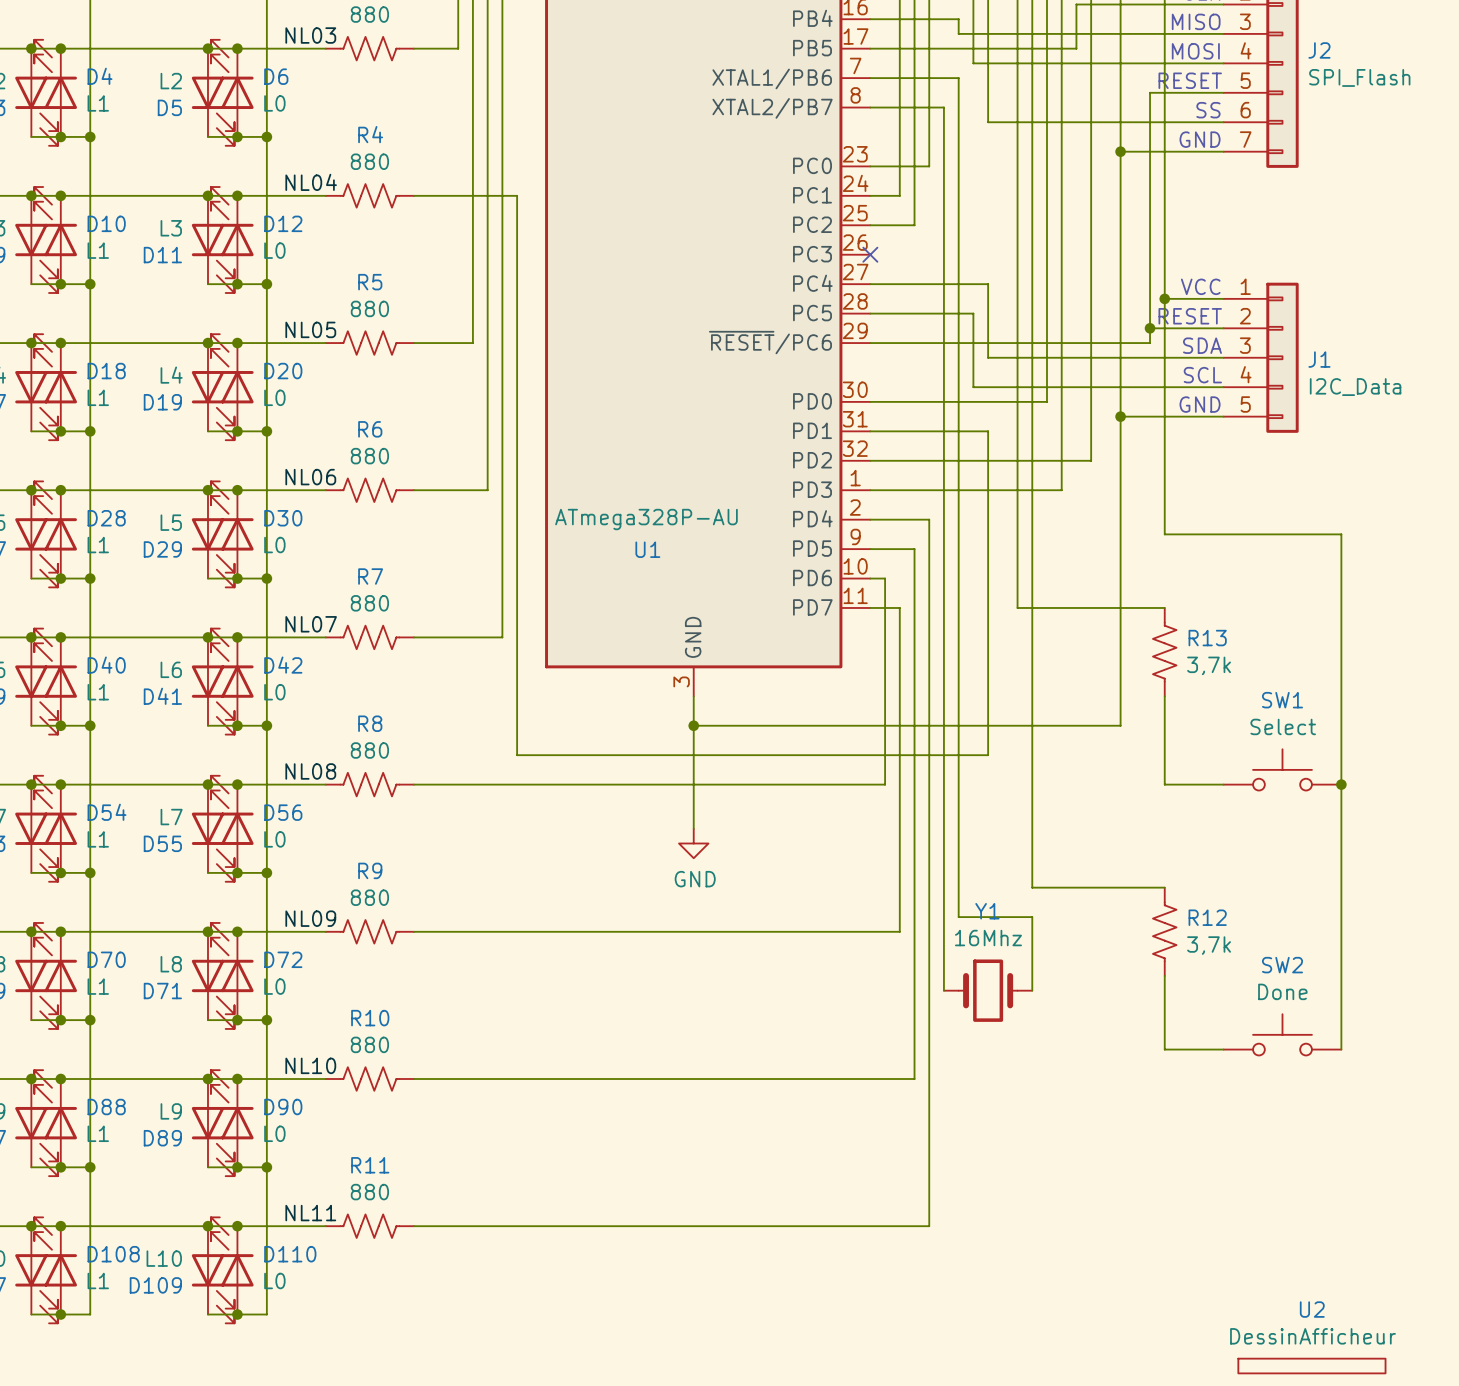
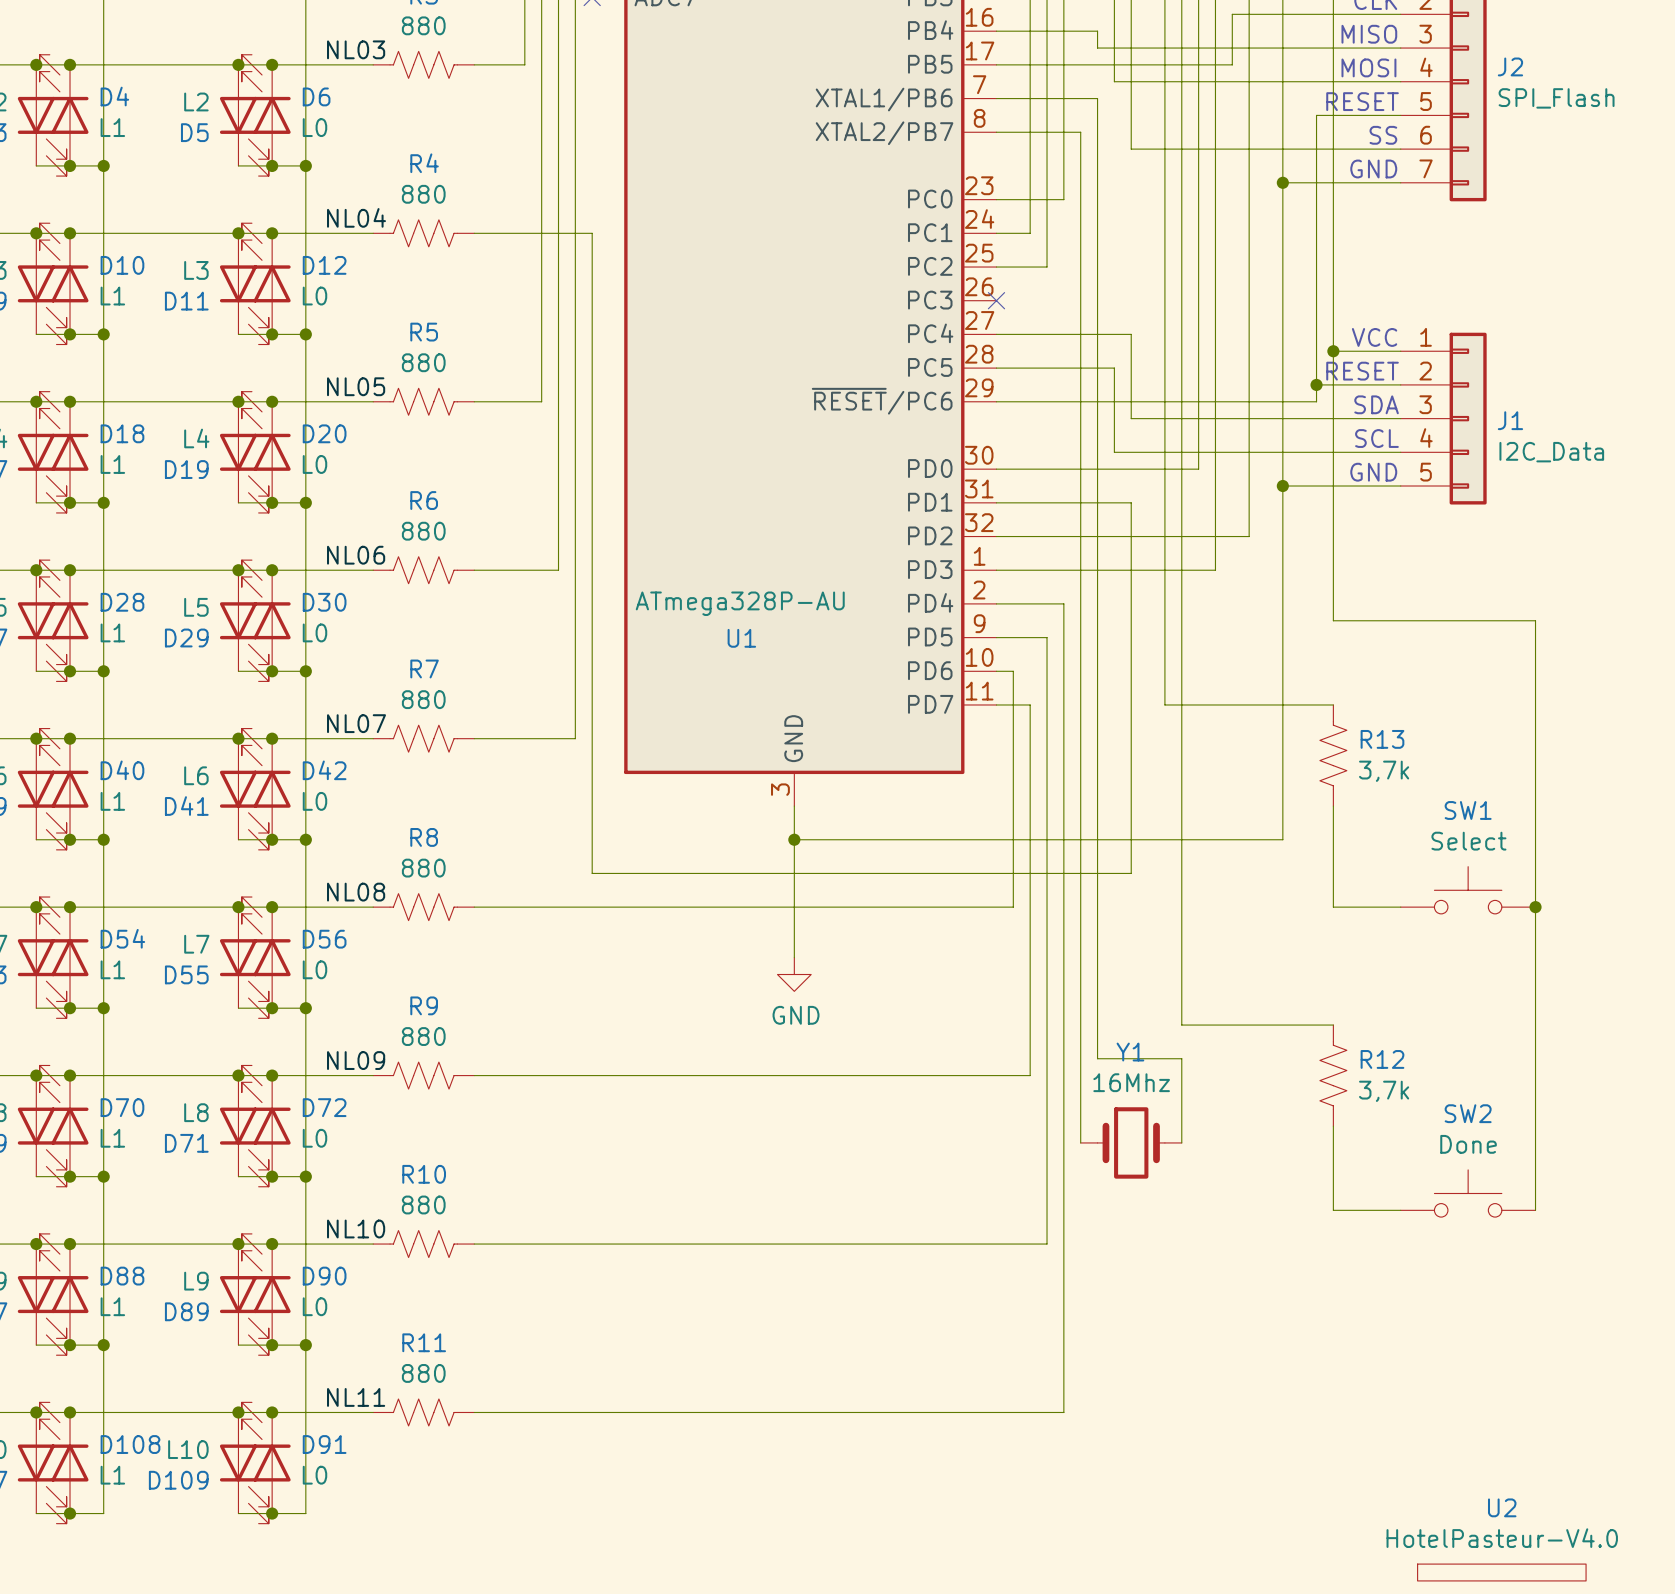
D110 name: D110 (290, 1254) -> D91 (324, 1444)
U2 value: DessinAfficheur (1312, 1336) -> HotelPasteur-V4.0 (1502, 1538)

